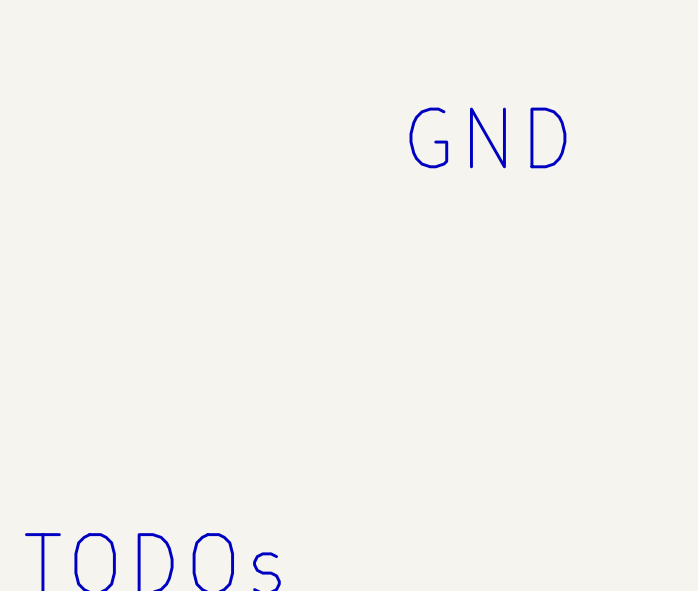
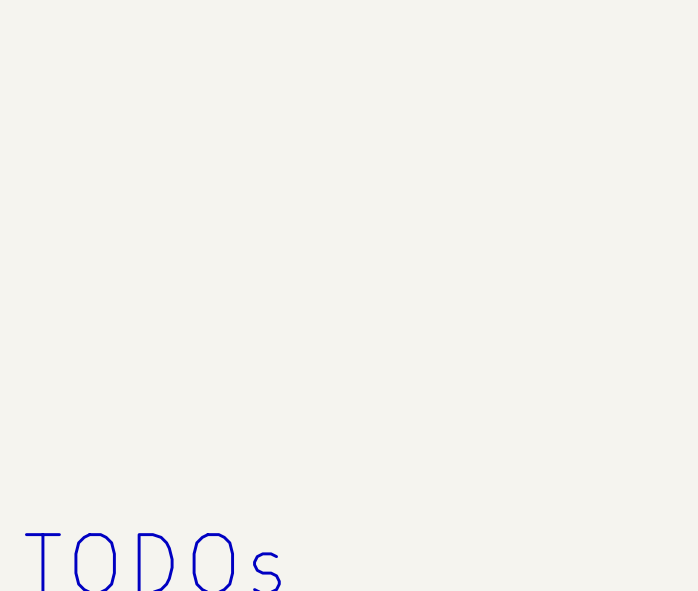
text: GND (487, 137) -> none

